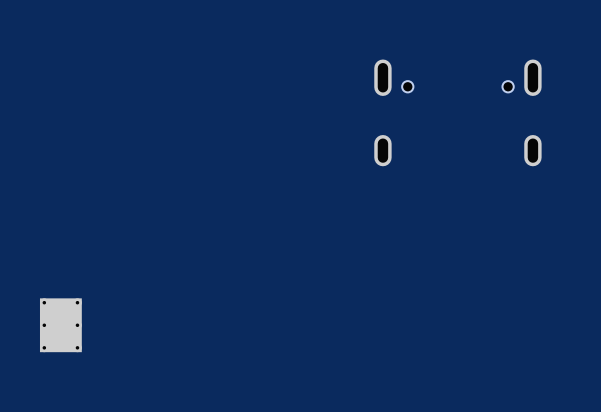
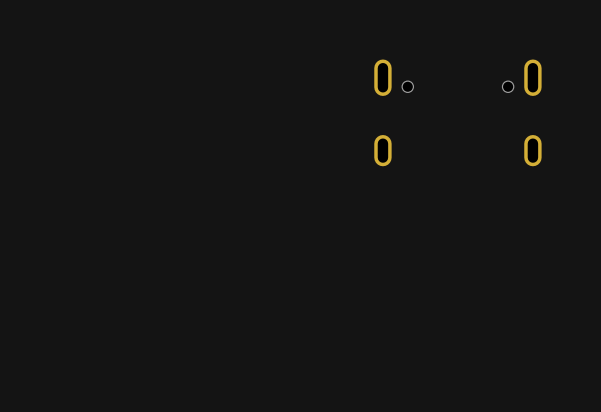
part: (60, 325) -> none

